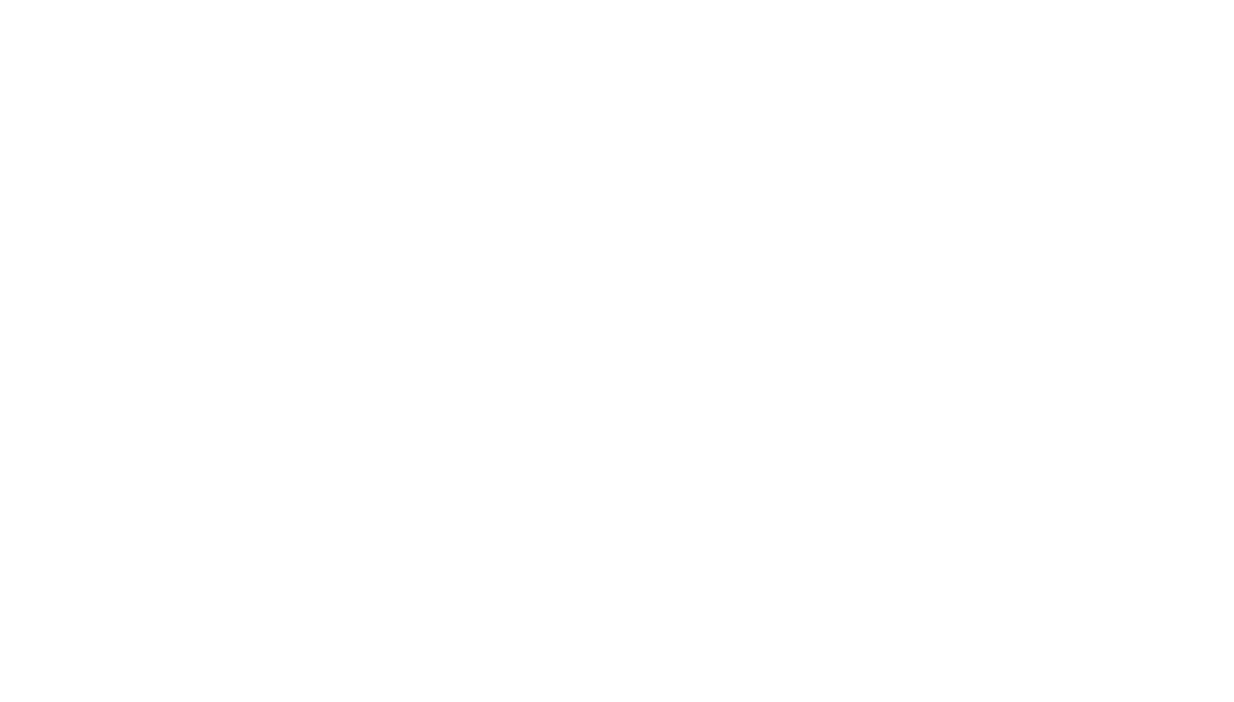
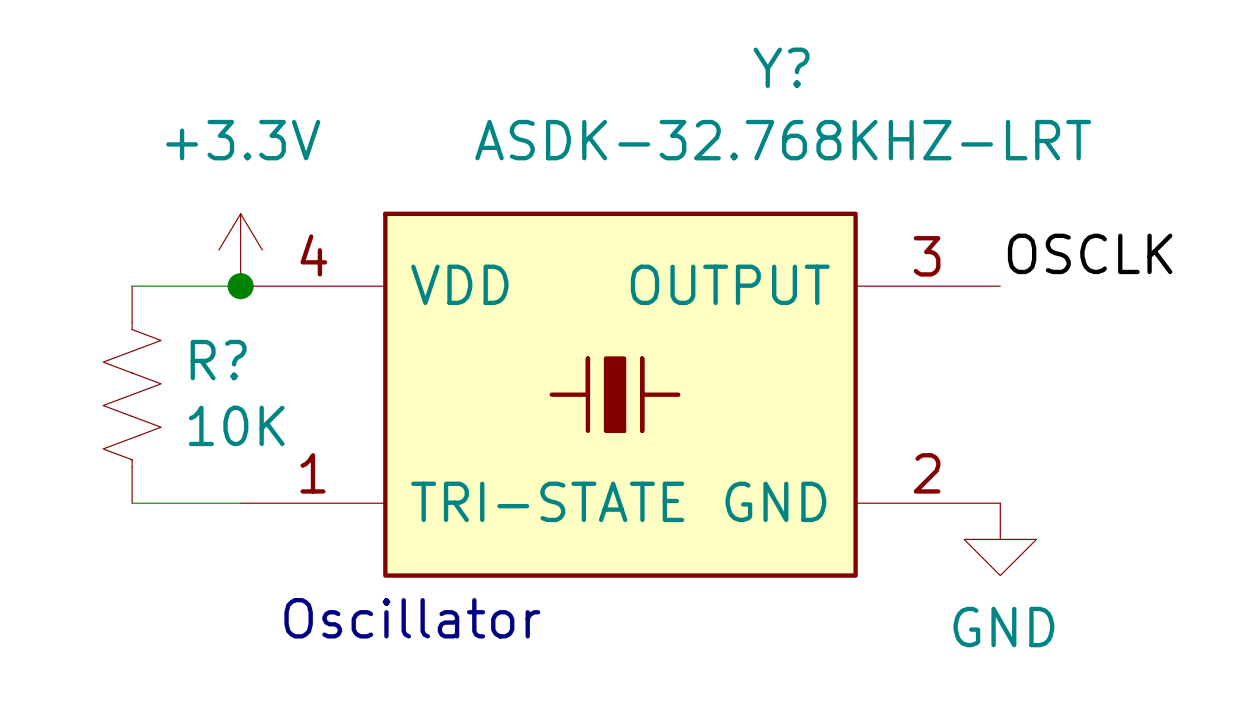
power symbol: none -> +3.3V (240, 249)
label: none -> OSCLK (1090, 253)
wire: none -> (132, 286) (240, 286)
junction: none -> (240, 286)
R?: none -> 10K (132, 394)
Y?: none -> ASDK-32.768KHZ-LRT (620, 394)
wire: none -> (132, 503) (240, 503)
power symbol: none -> GND (1000, 539)
text: none -> Oscillator (412, 618)

